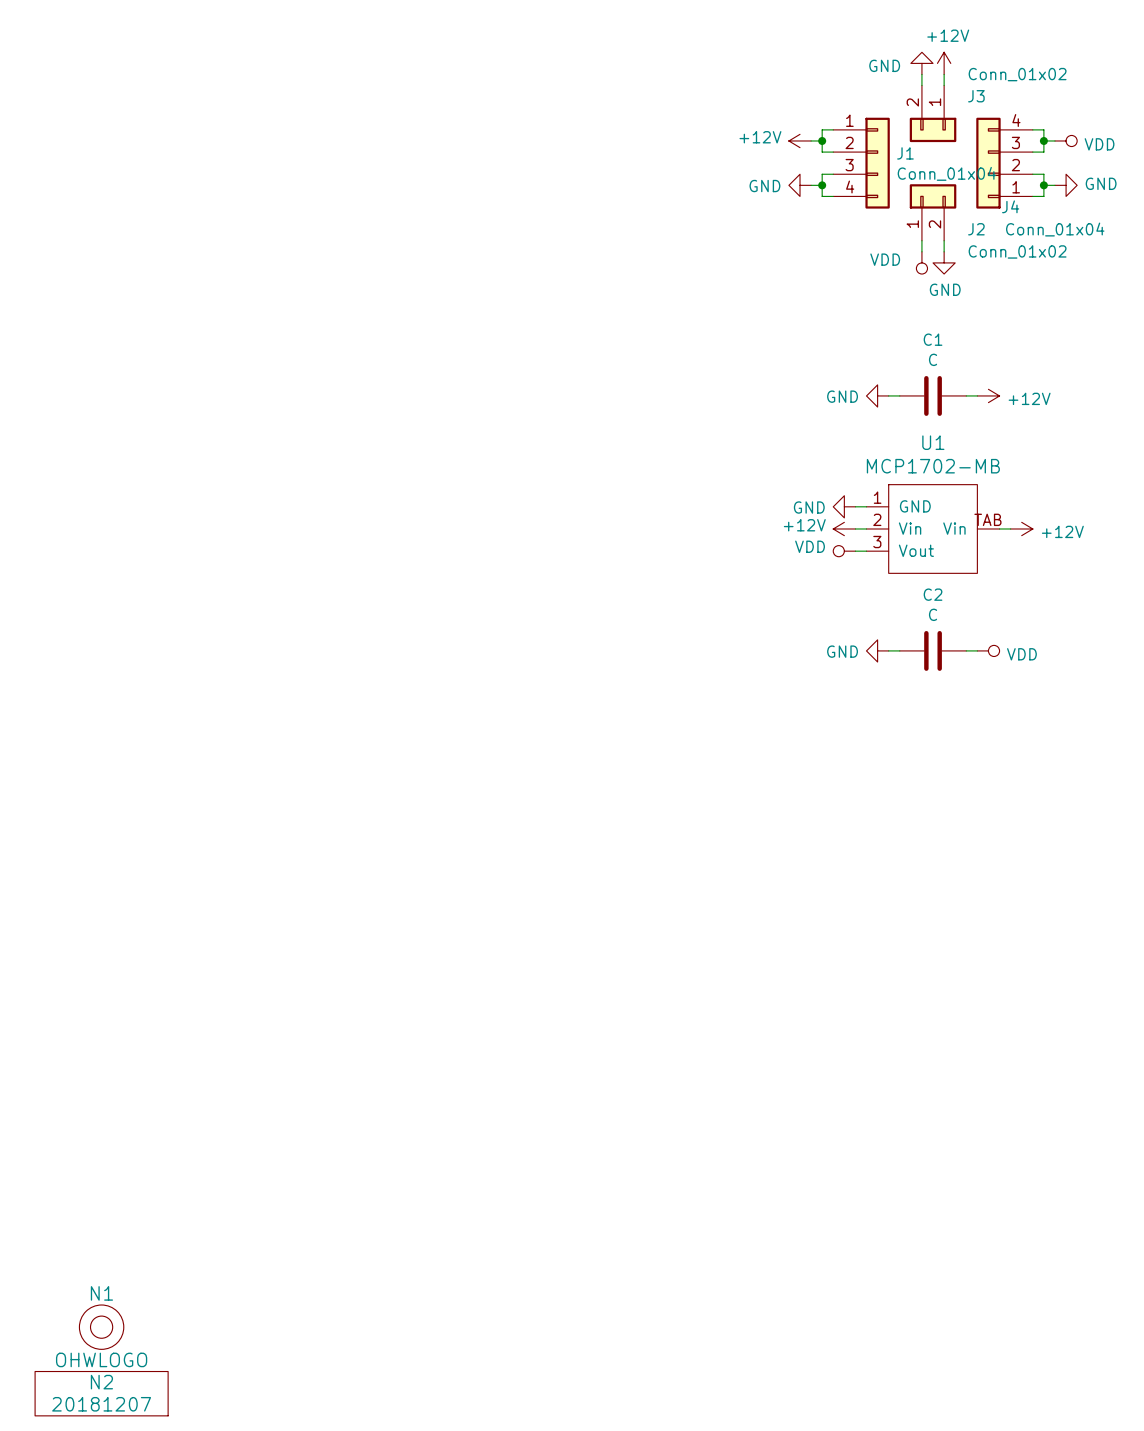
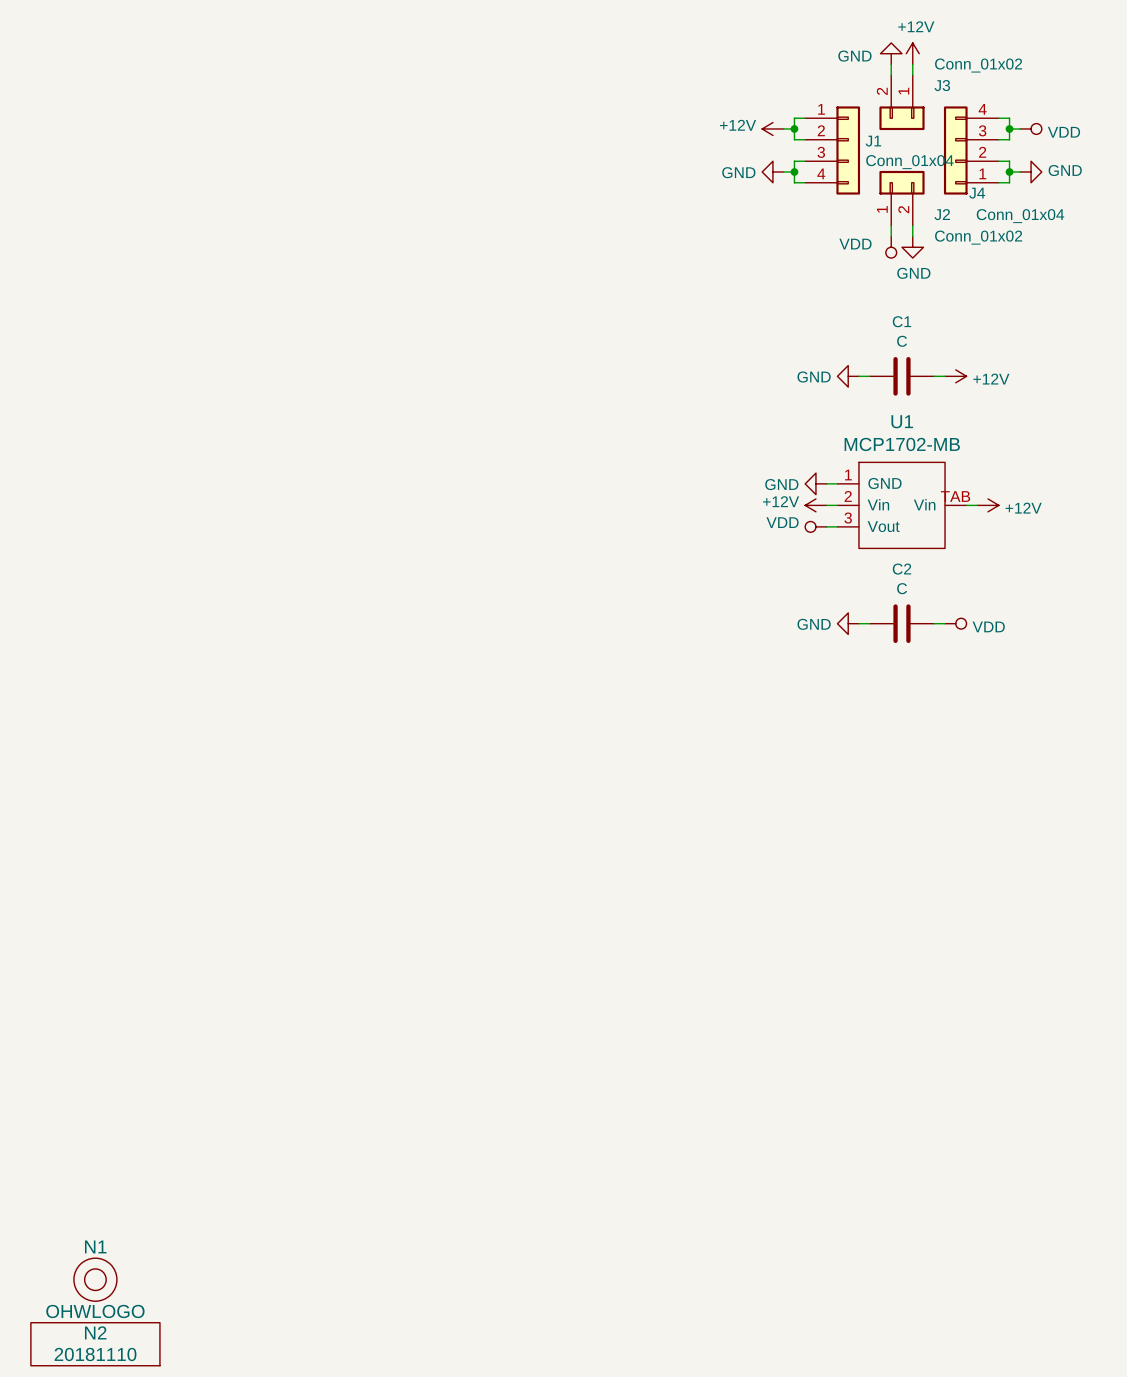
N2 value: 20181207 (101, 1404) -> 20181110 (95, 1354)

